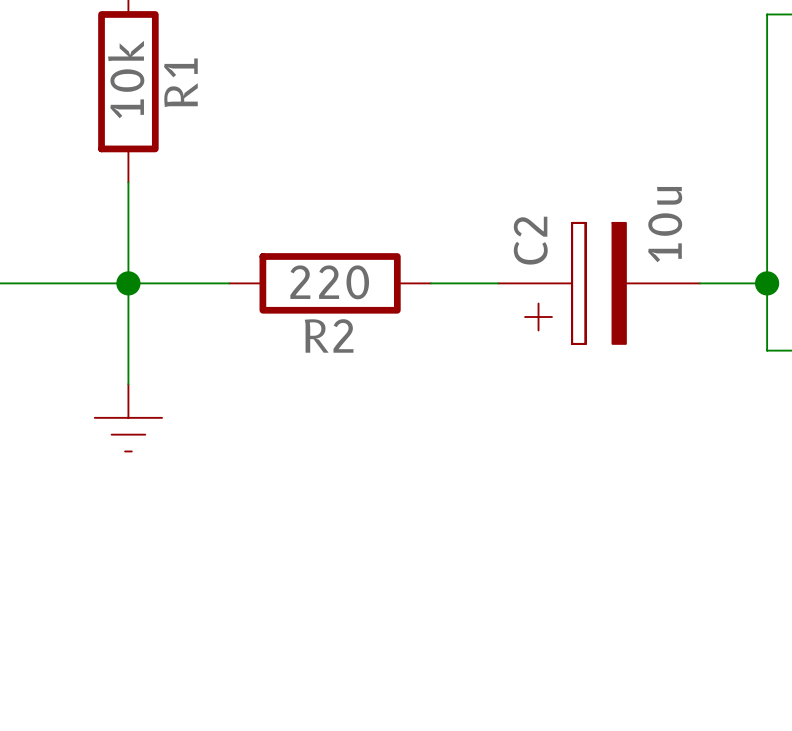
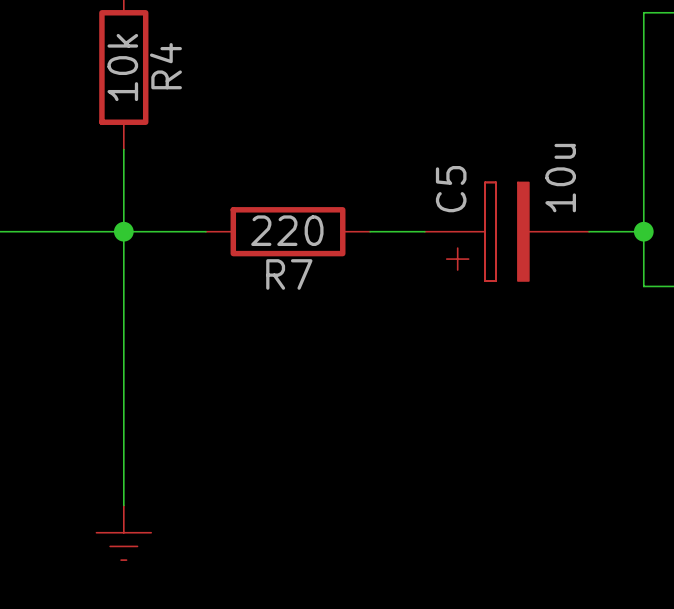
R1 name: R1 (180, 82) -> R4 (165, 66)
C2 name: C2 (530, 240) -> C5 (451, 189)
R2 name: R2 (329, 335) -> R7 (289, 274)
wire: none -> (123, 313) (123, 505)
power symbol position: (128, 417) -> (123, 532)

